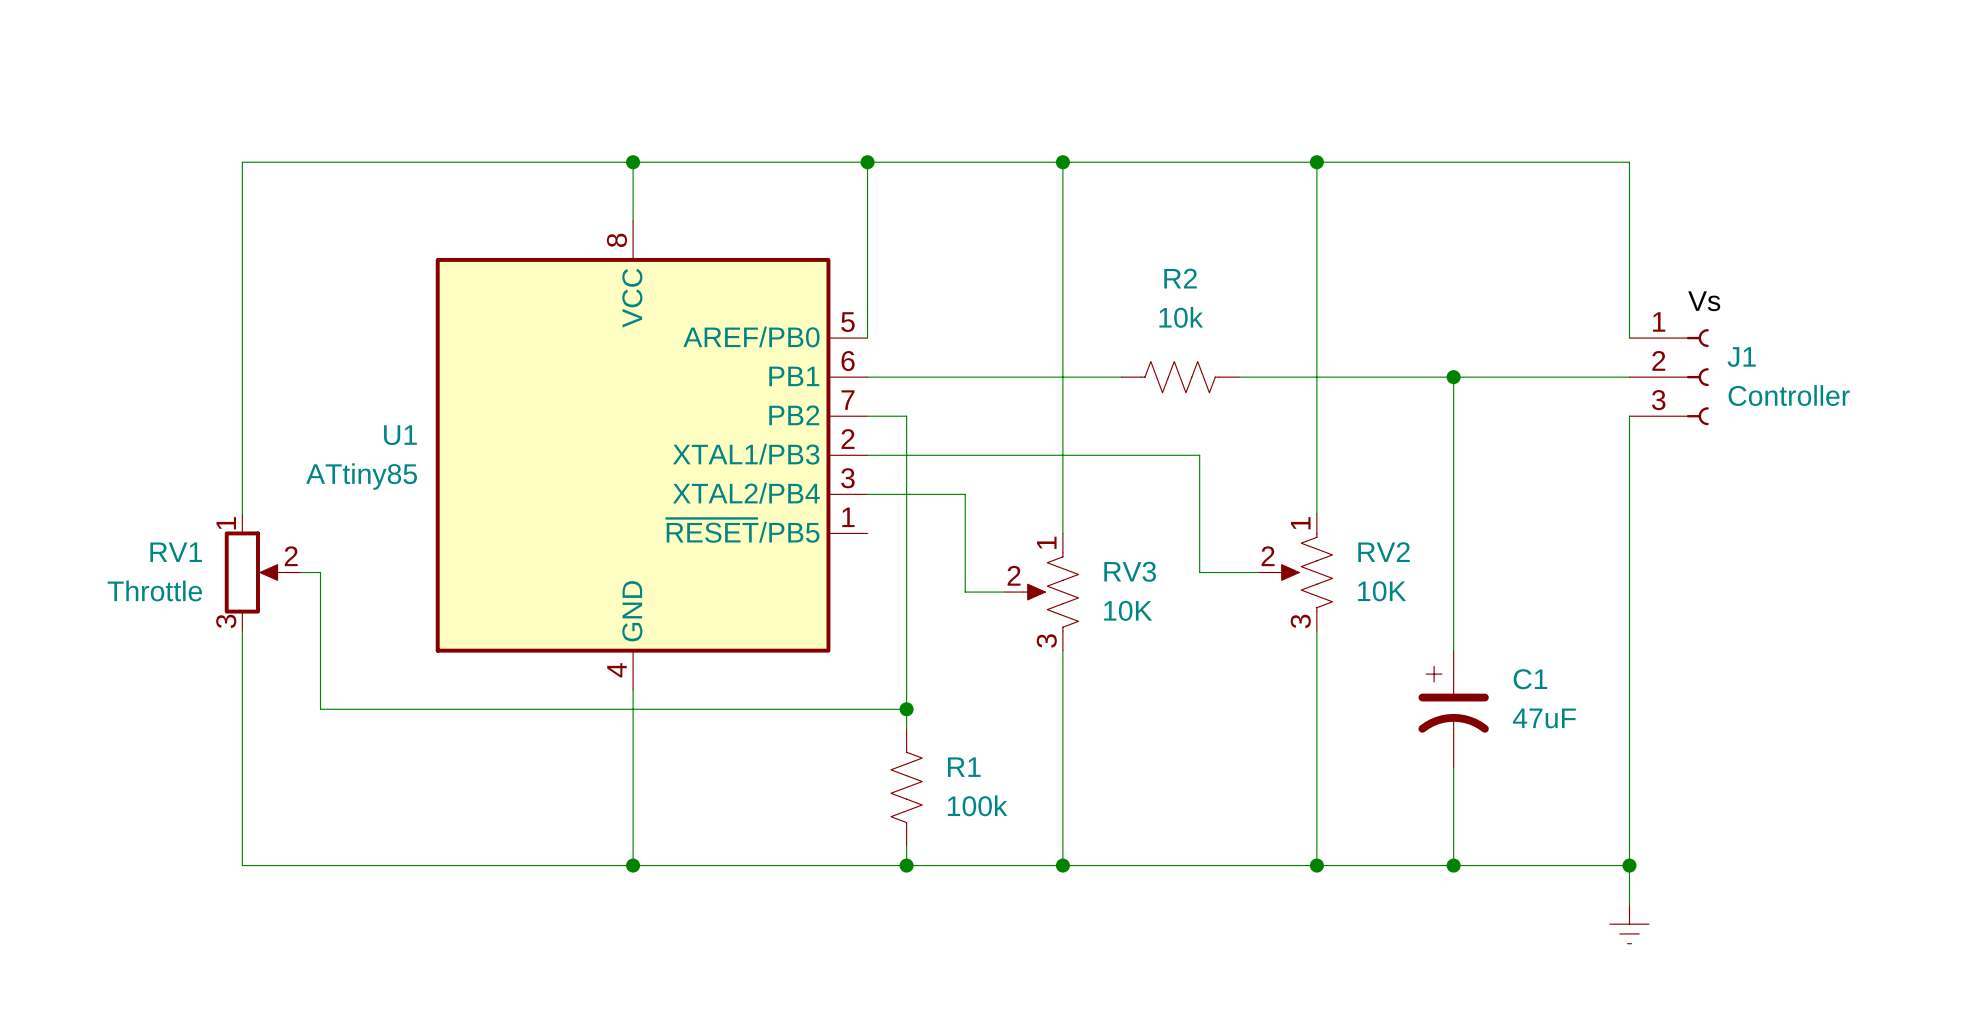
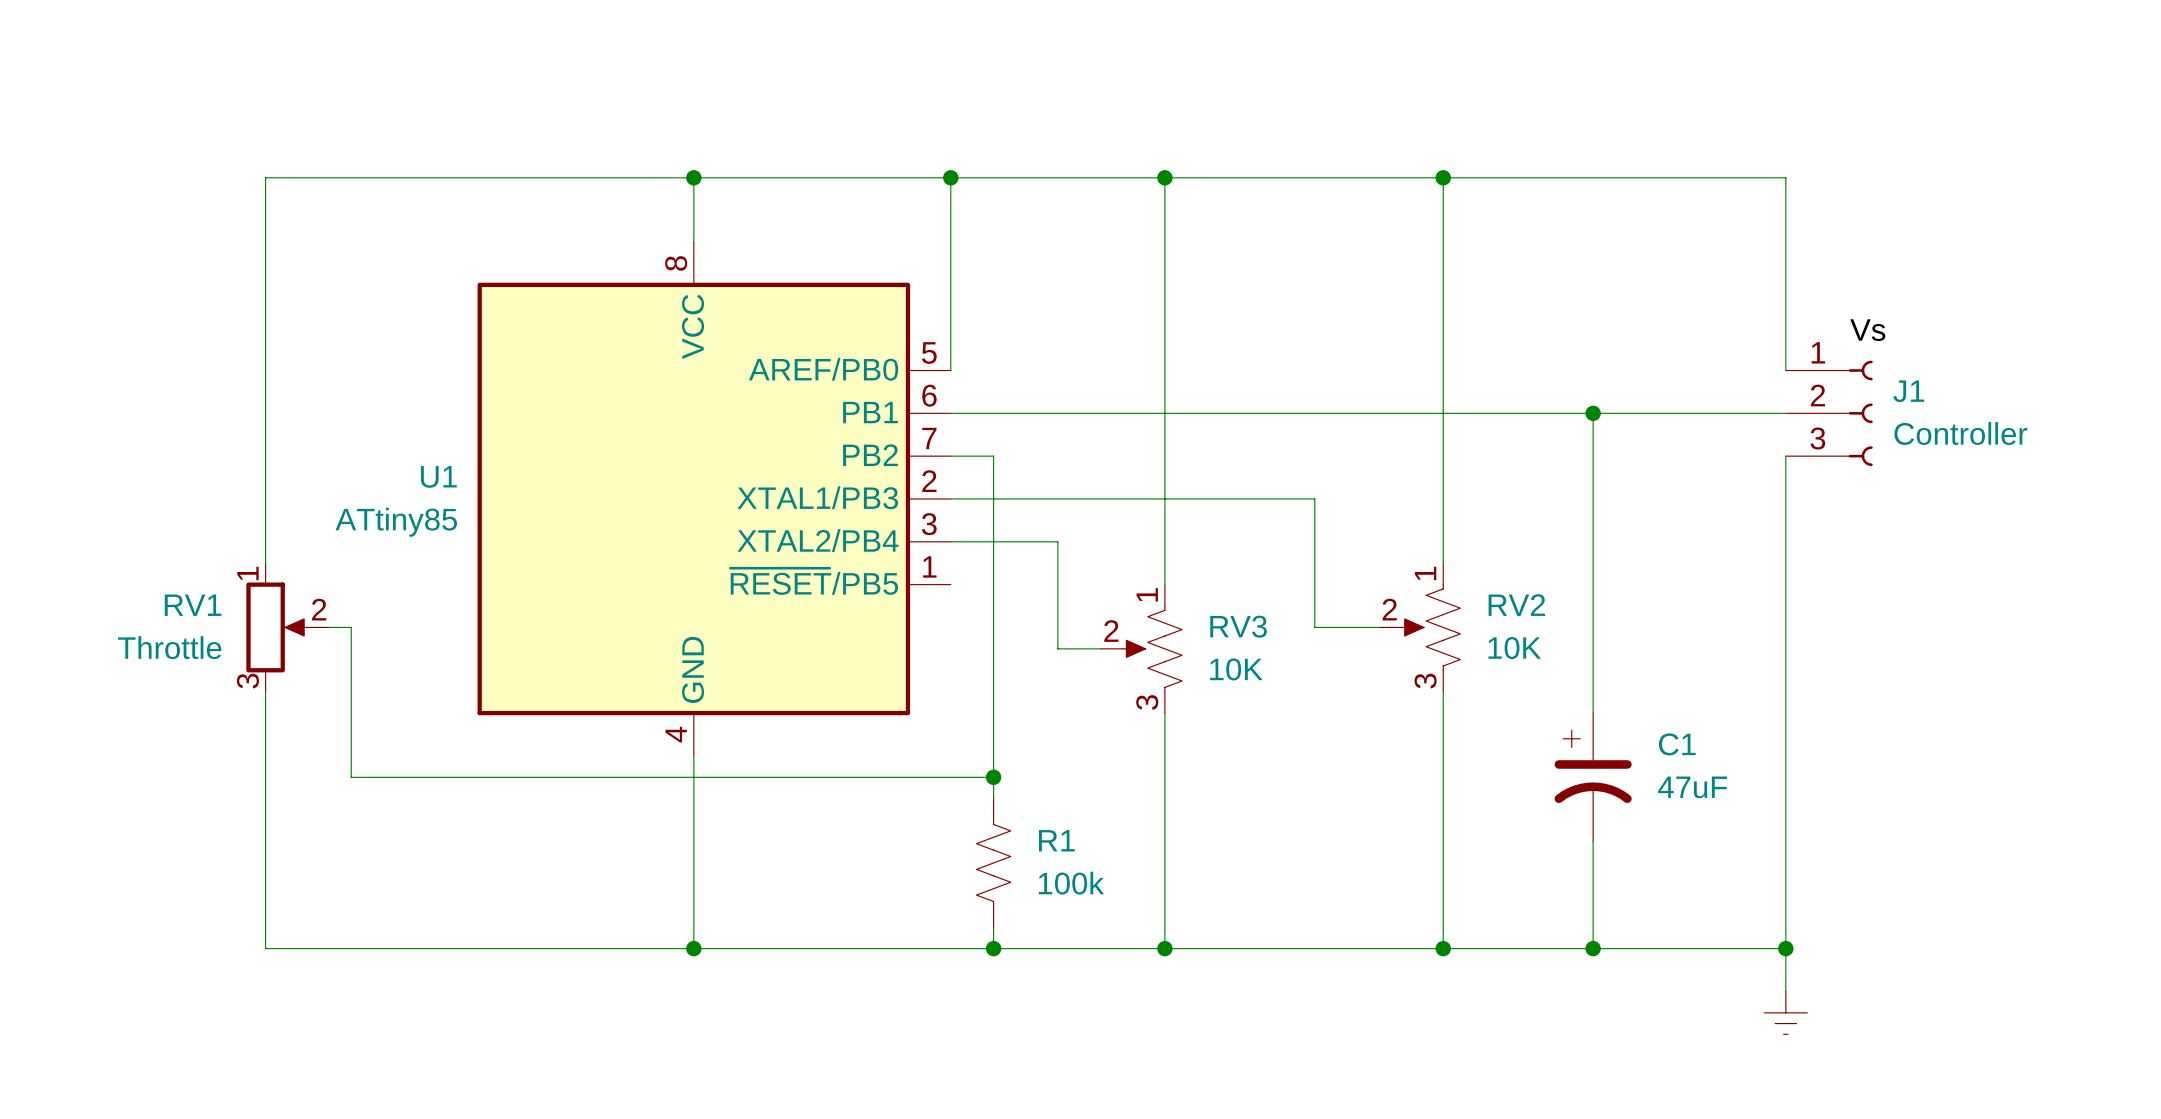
wire: none -> (1229, 413) (1357, 413)
R2: 10k (1180, 377) -> none

